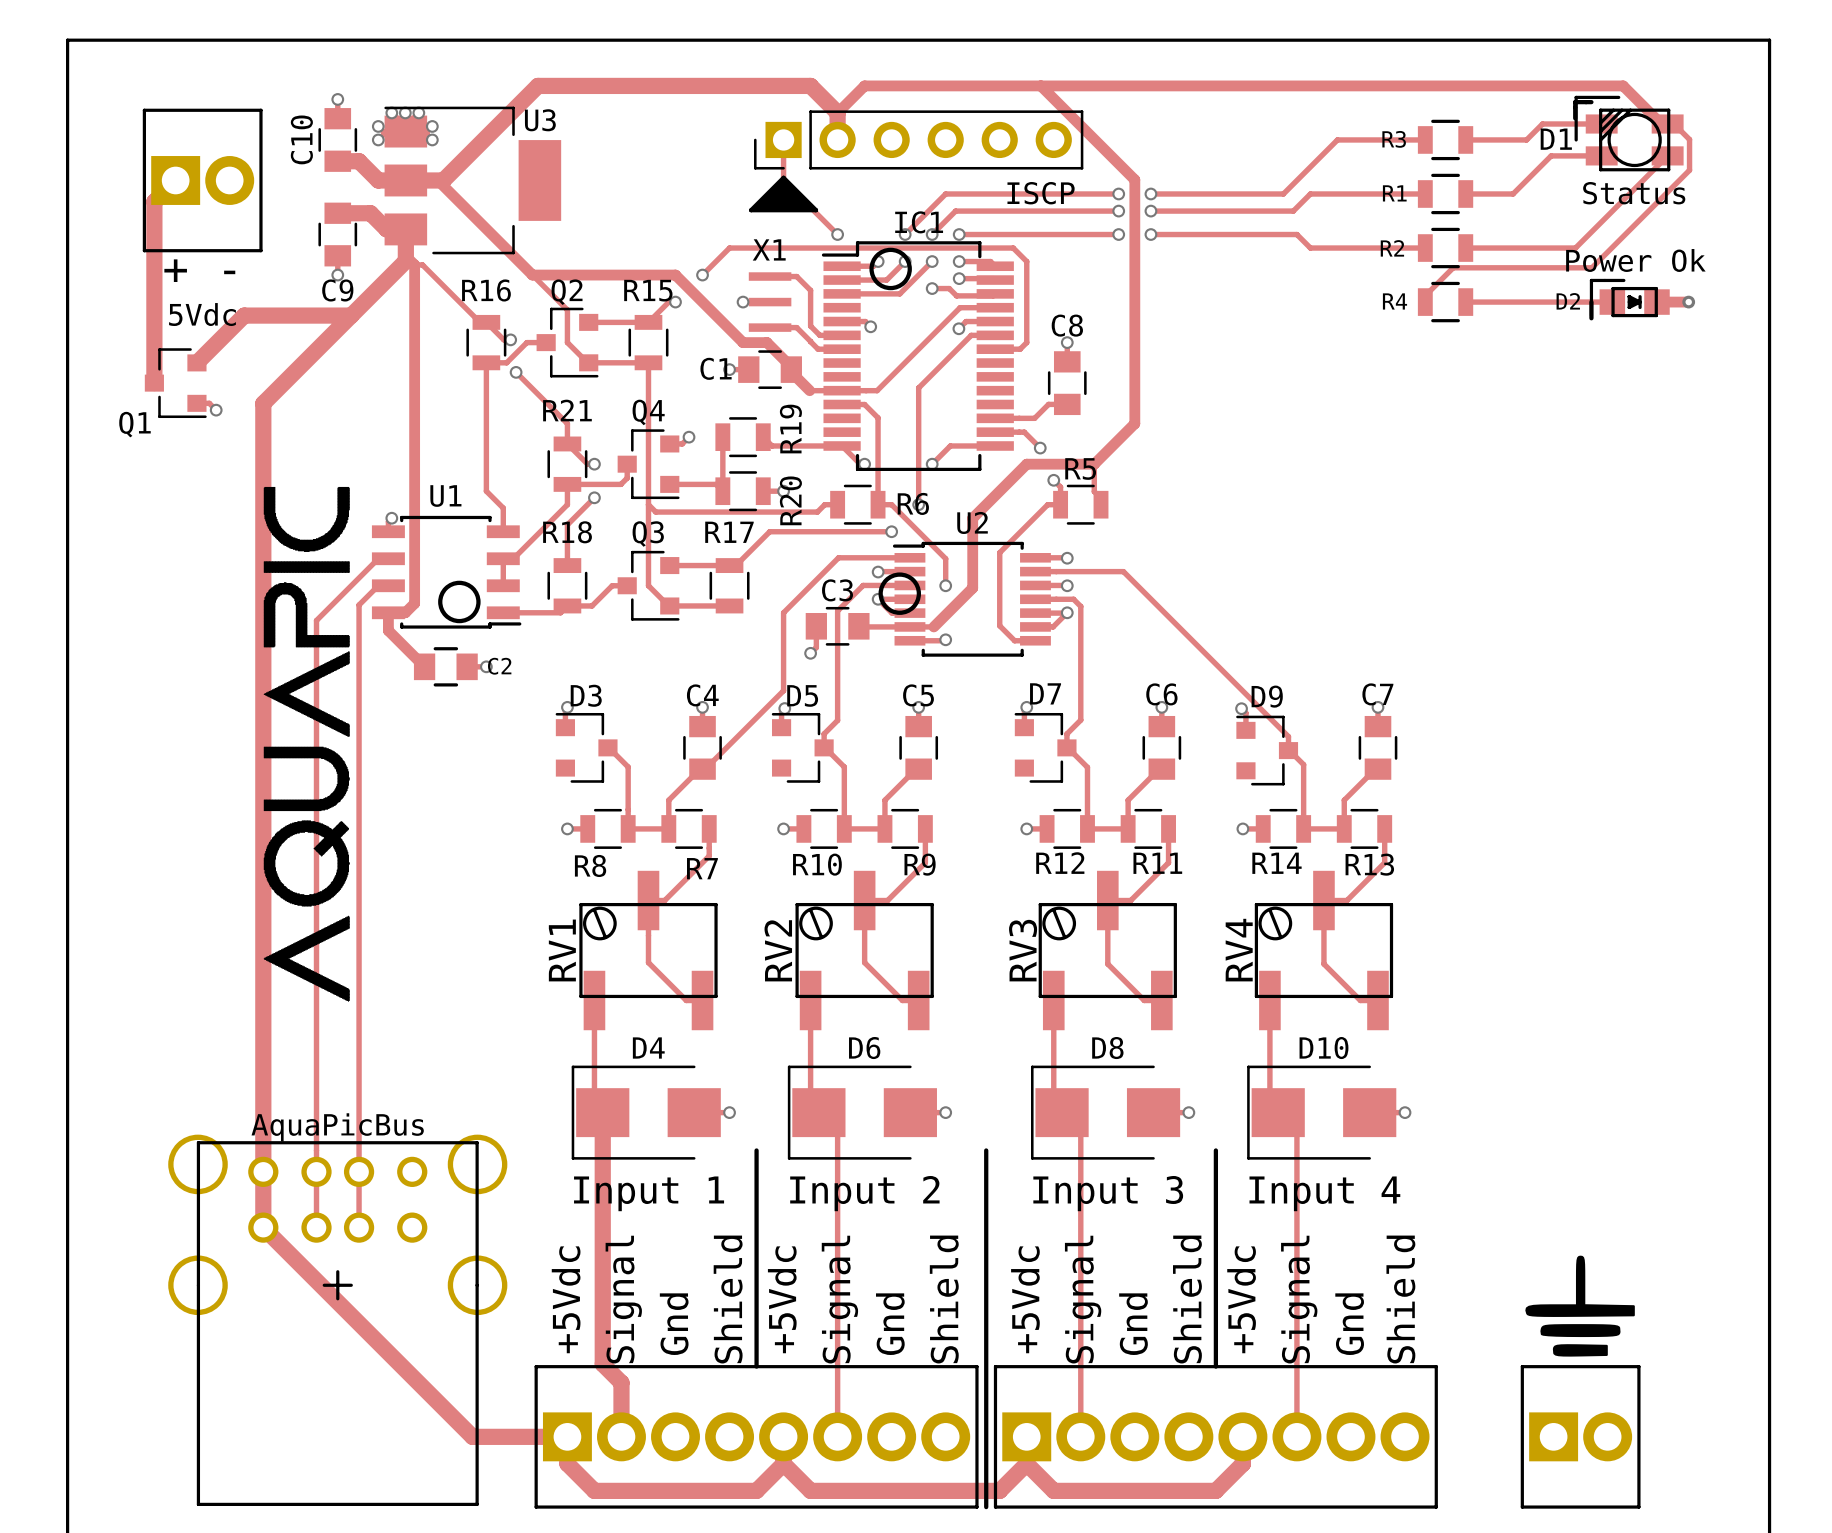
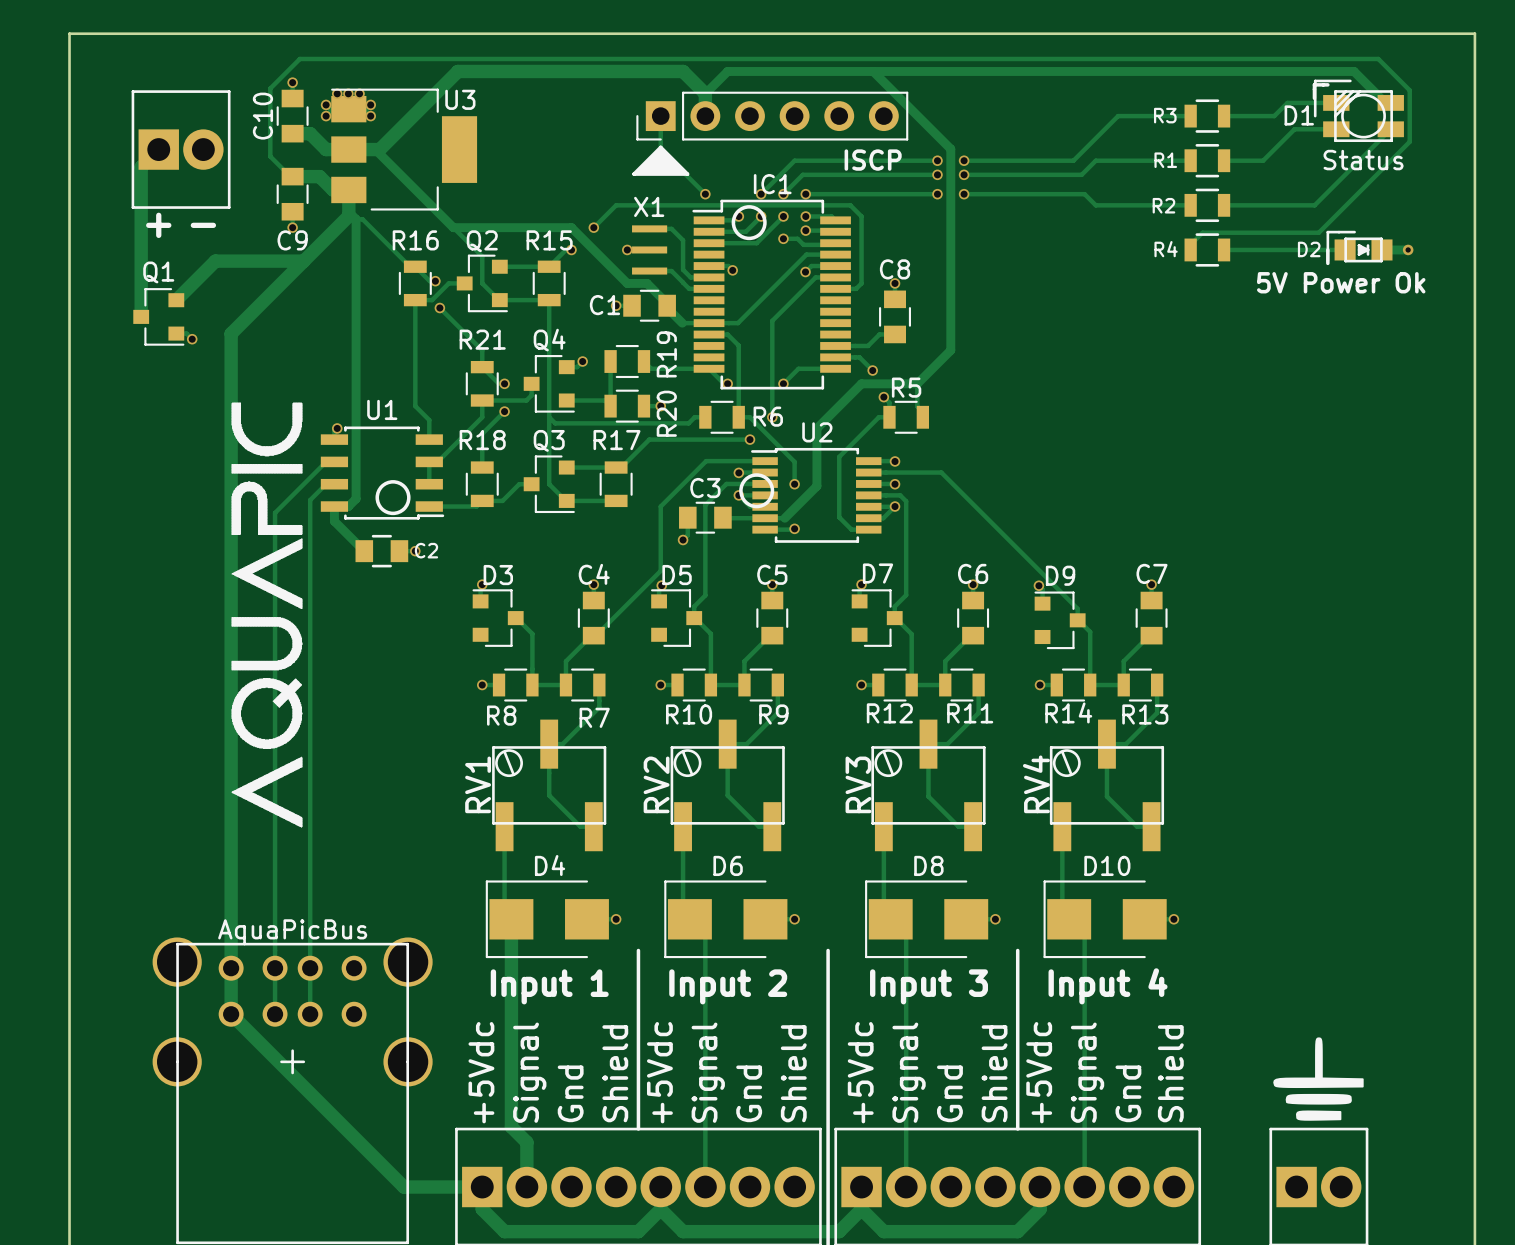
track: (1667, 124) (1674, 124) (1689, 139) (1689, 170) (1591, 267) (1453, 267) (1439, 281) -> (290, 176) (270, 156) (270, 88) (299, 58) (1378, 58) (1409, 90) (1409, 141) (1318, 232) (1202, 232)
text: Power Ok (1635, 260) -> none
5Vdc name: 5Vdc (202, 314) -> none
text: none -> 5V Power Ok (1341, 282)
Q1 name position: Q1 (134, 424) -> Q1 (158, 272)

